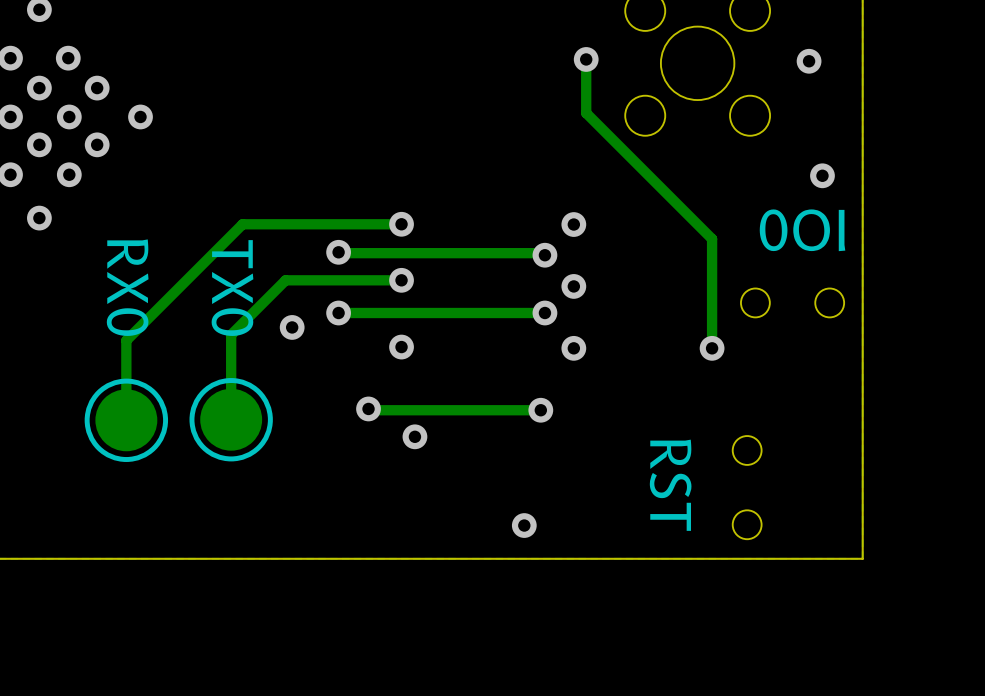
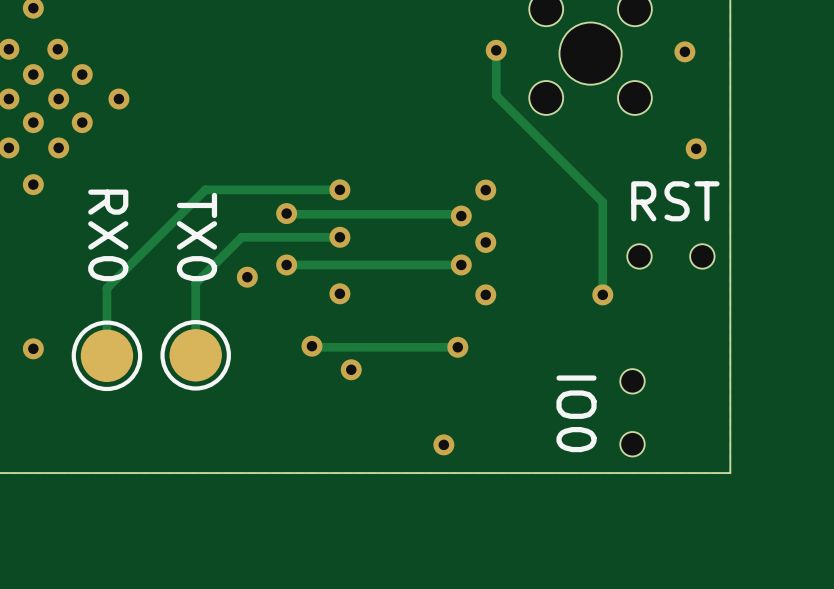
text: IO0 (802, 230) -> none
text: none -> RST (675, 201)
via: none -> (33, 348)
text: RST (670, 485) -> IO0 (576, 413)

